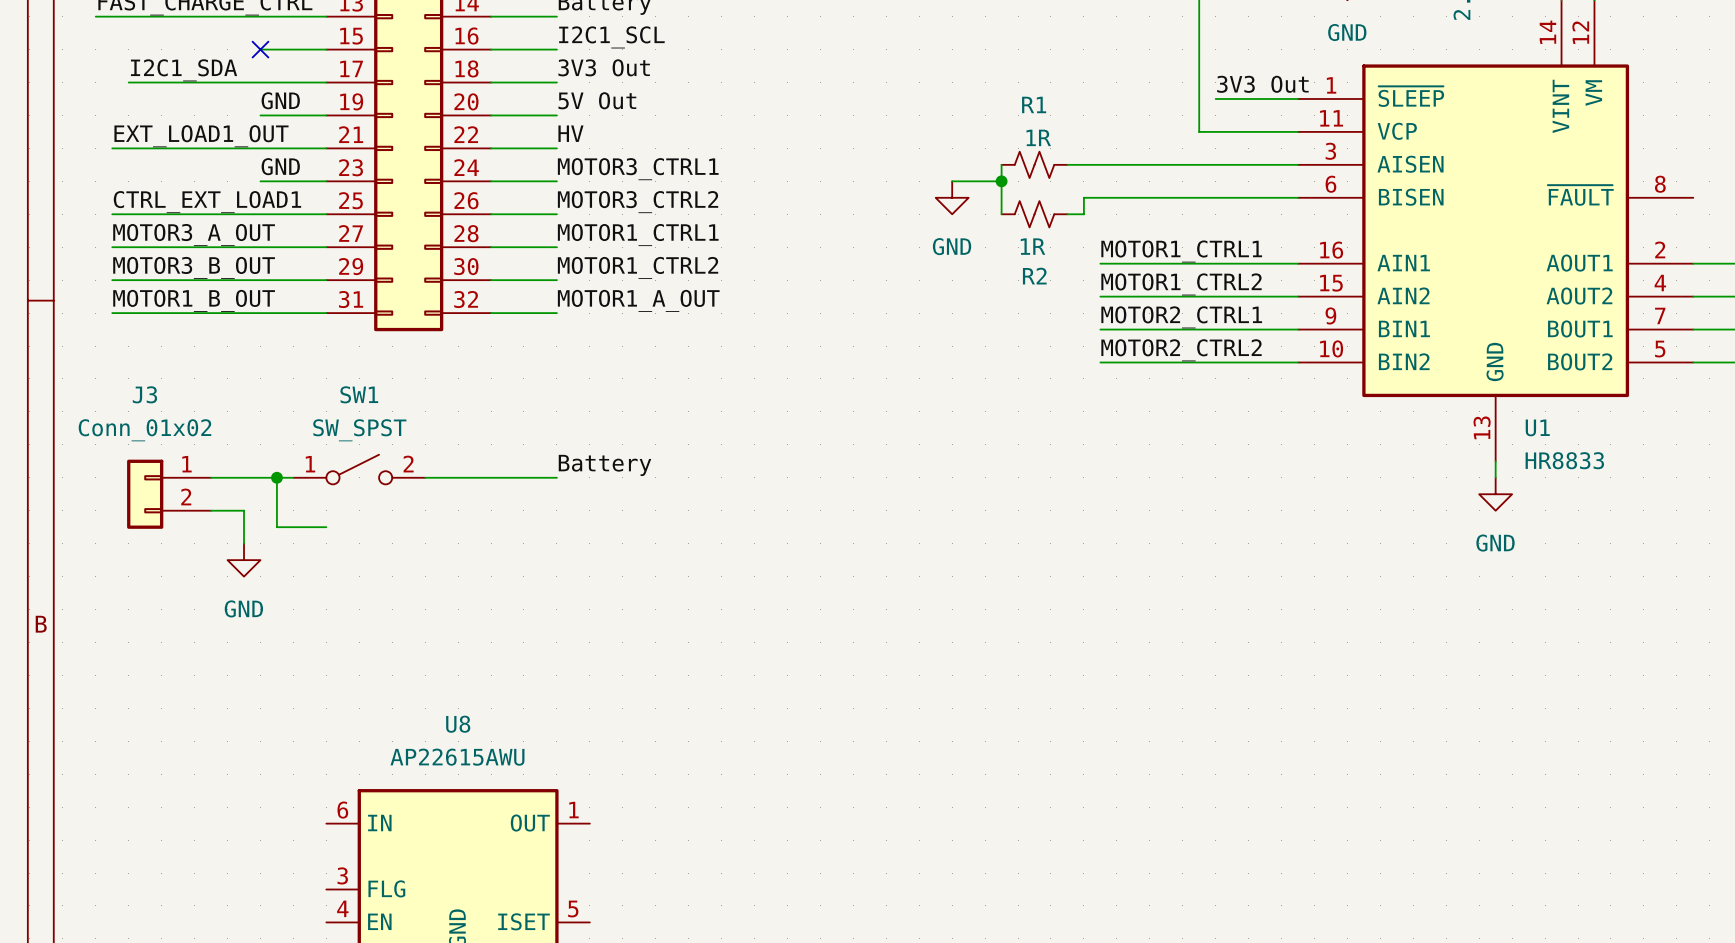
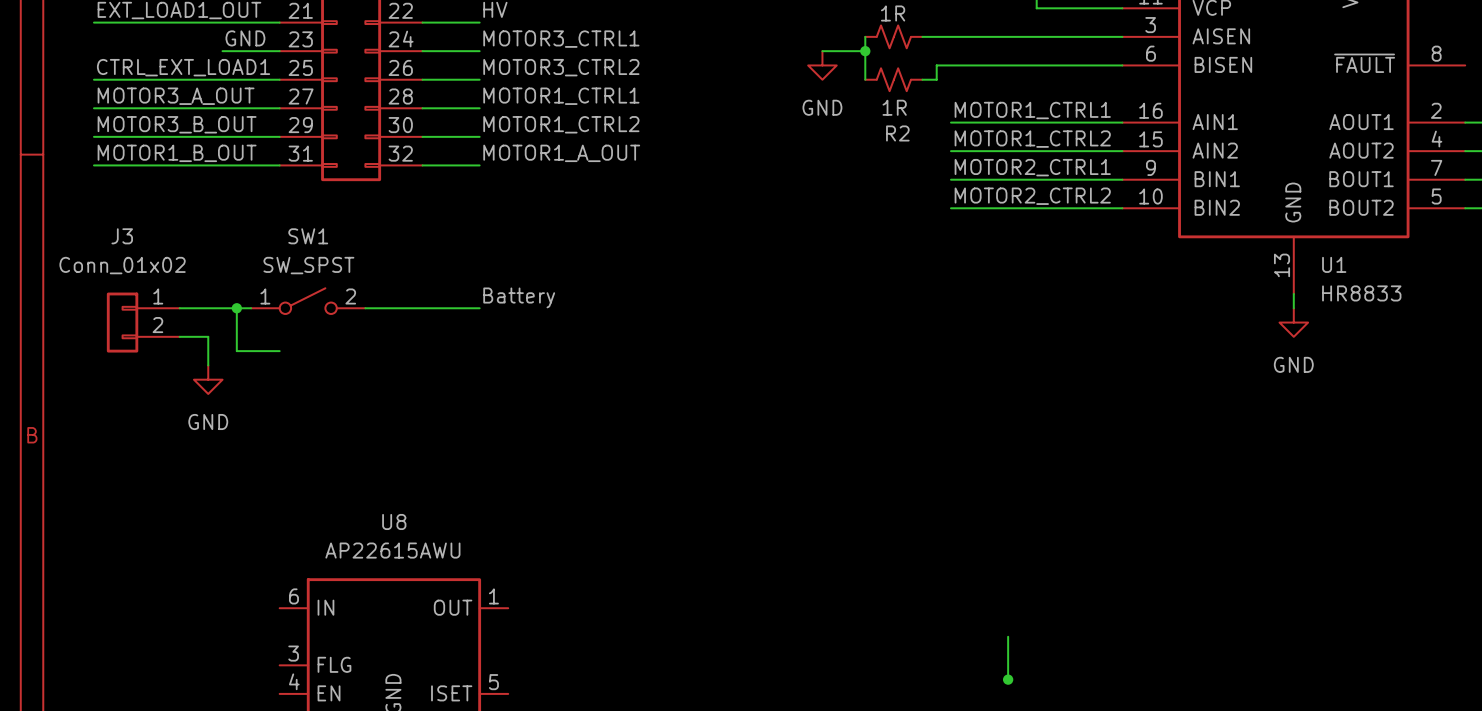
wire: none -> (1008, 636) (1008, 679)
junction: none -> (1008, 679)

